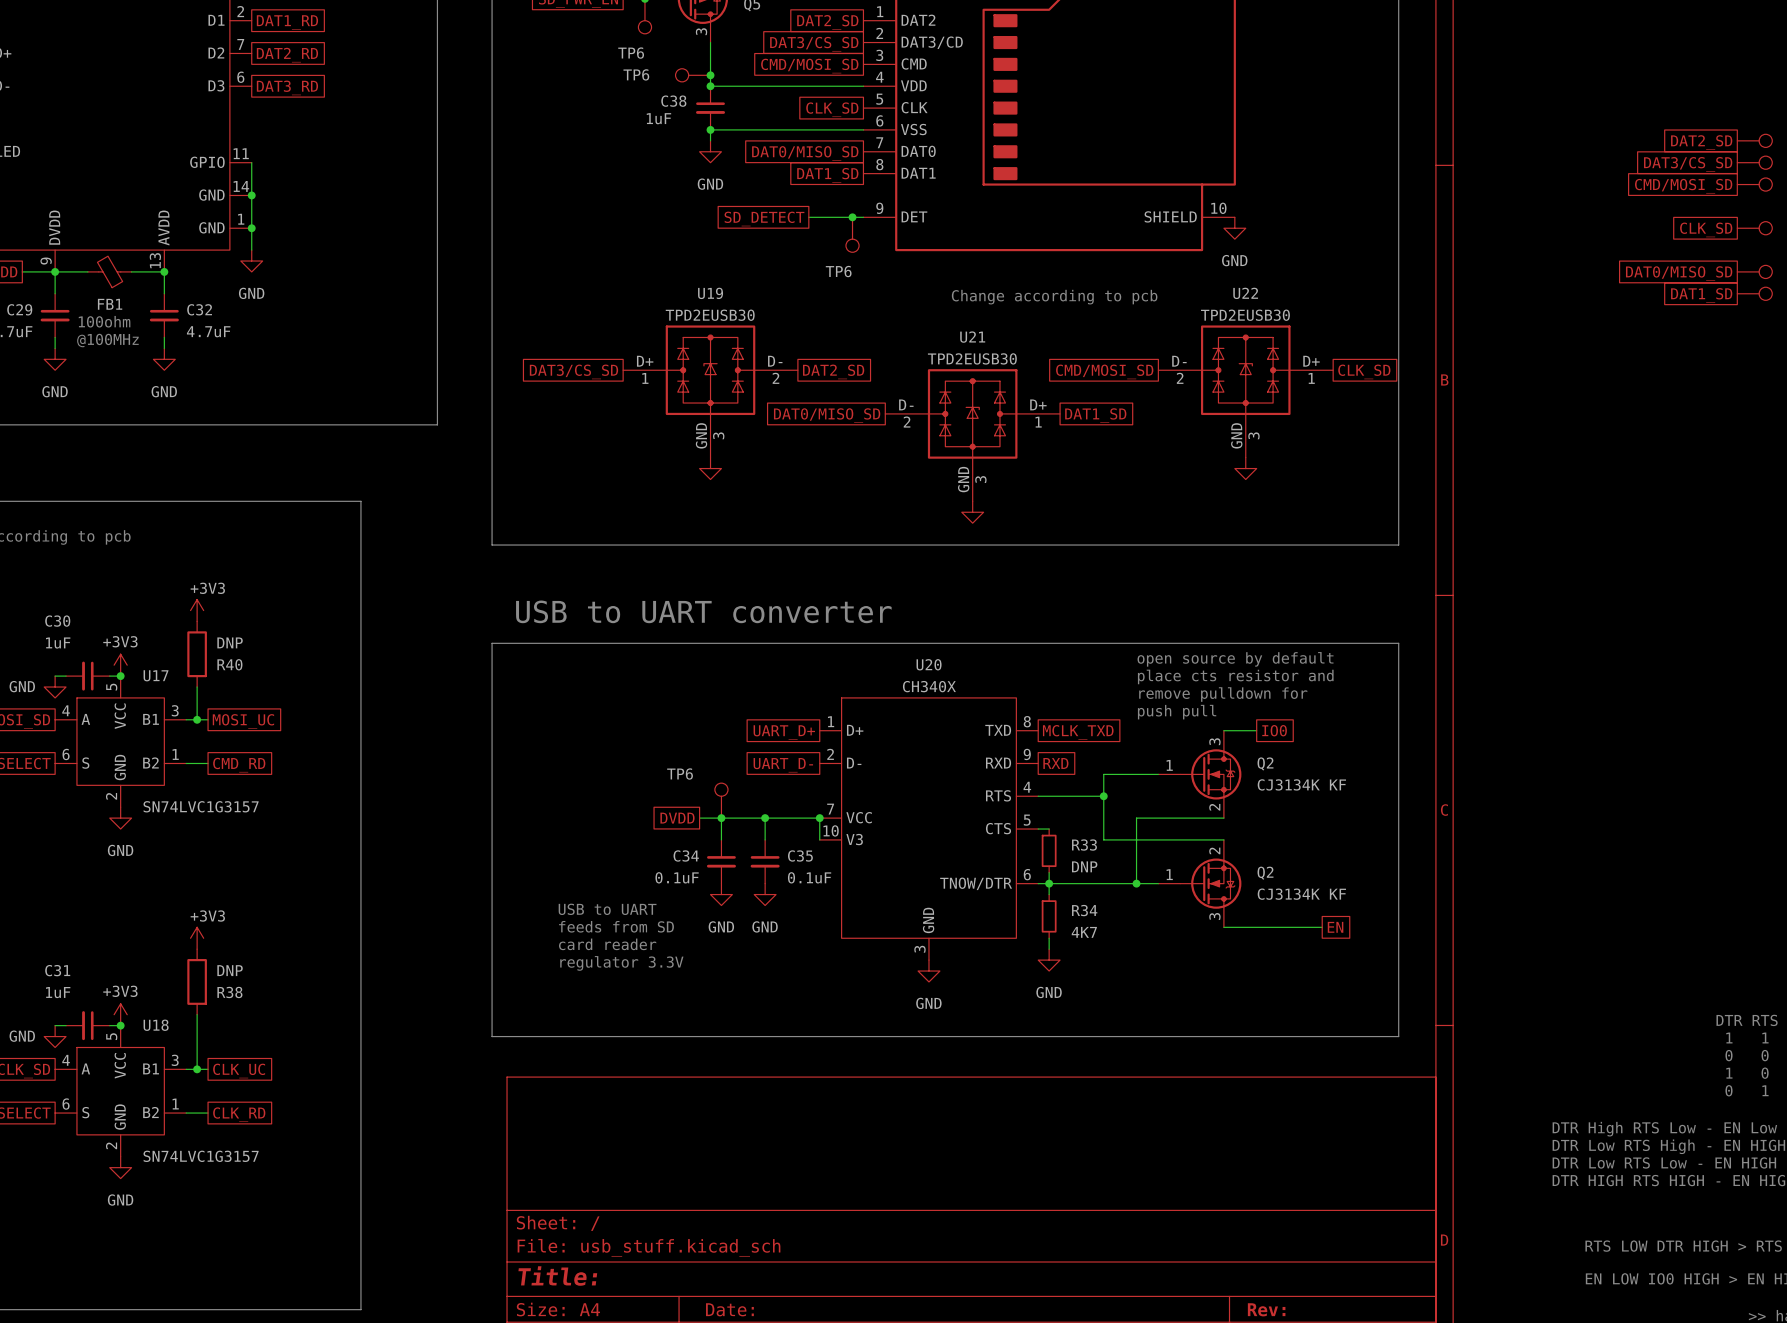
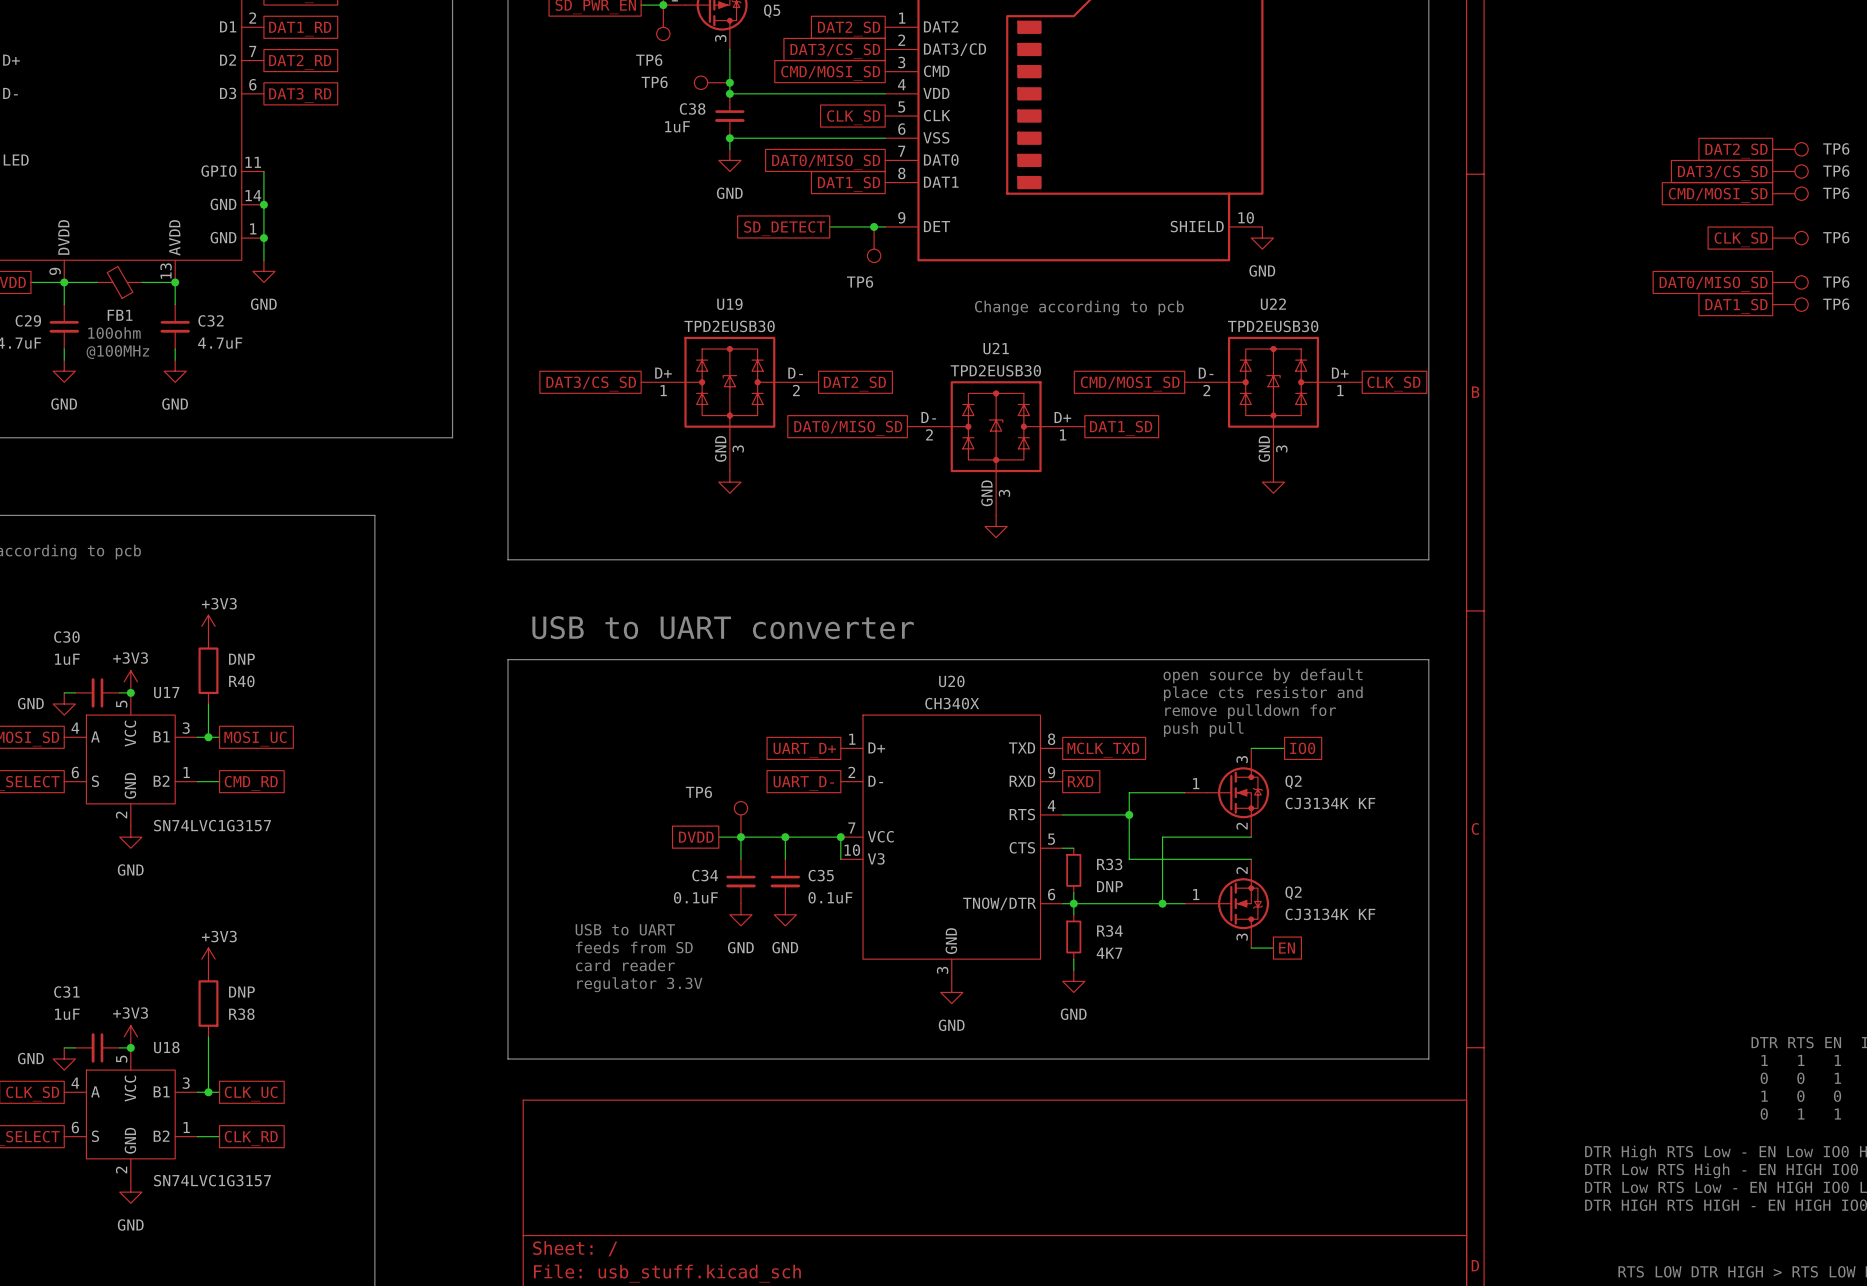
wire: (1245, 927) (1322, 927) -> none
global label position: EN (1335, 927) -> EN (1287, 948)

